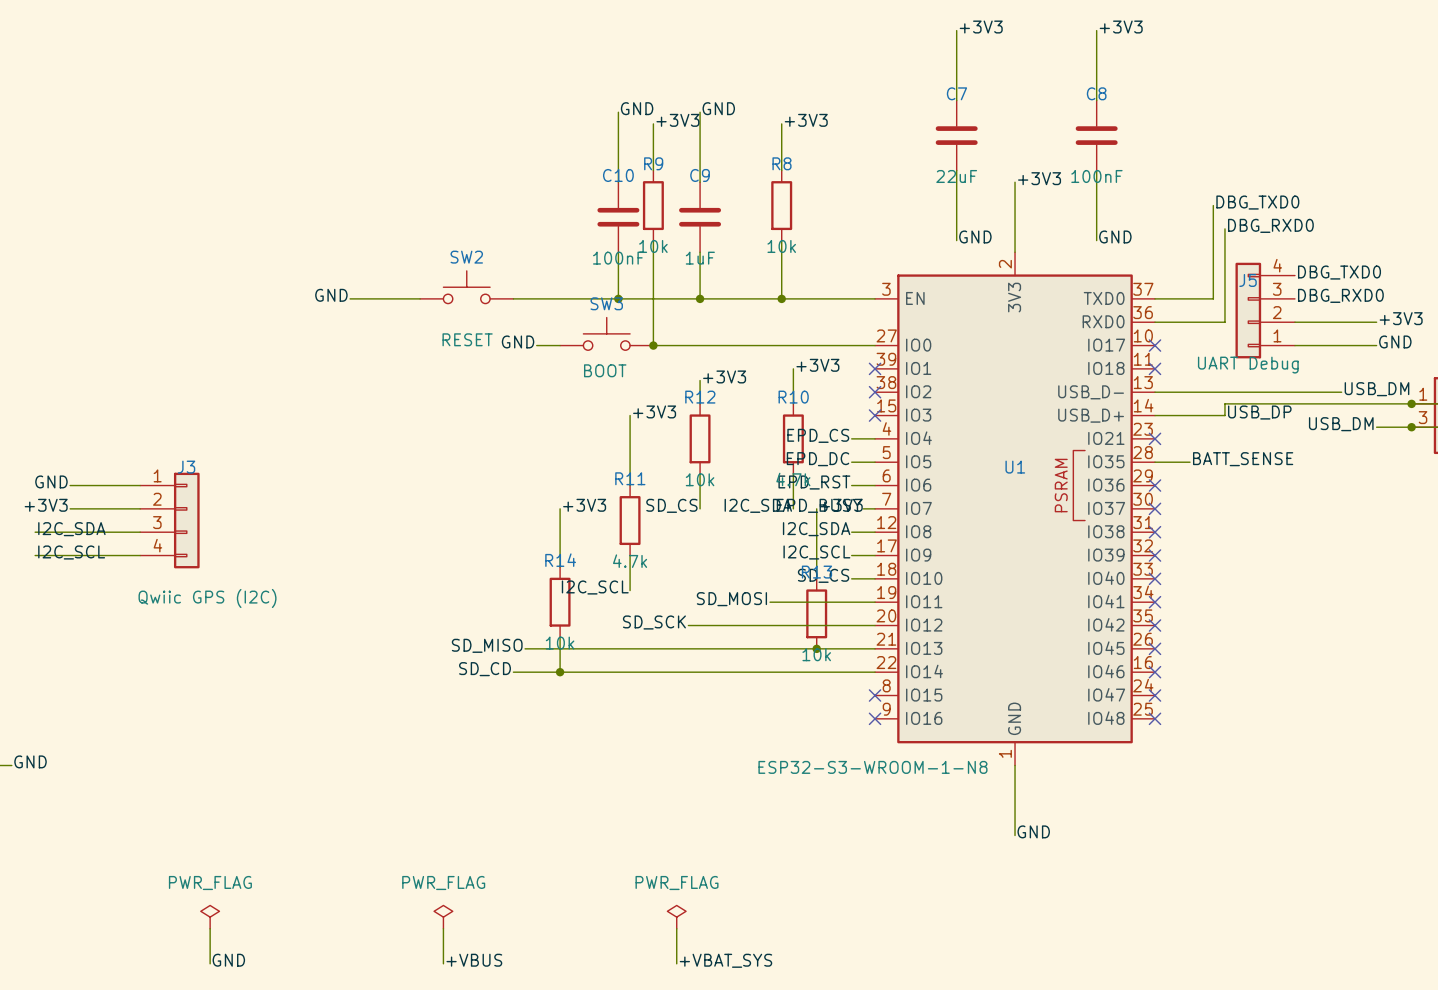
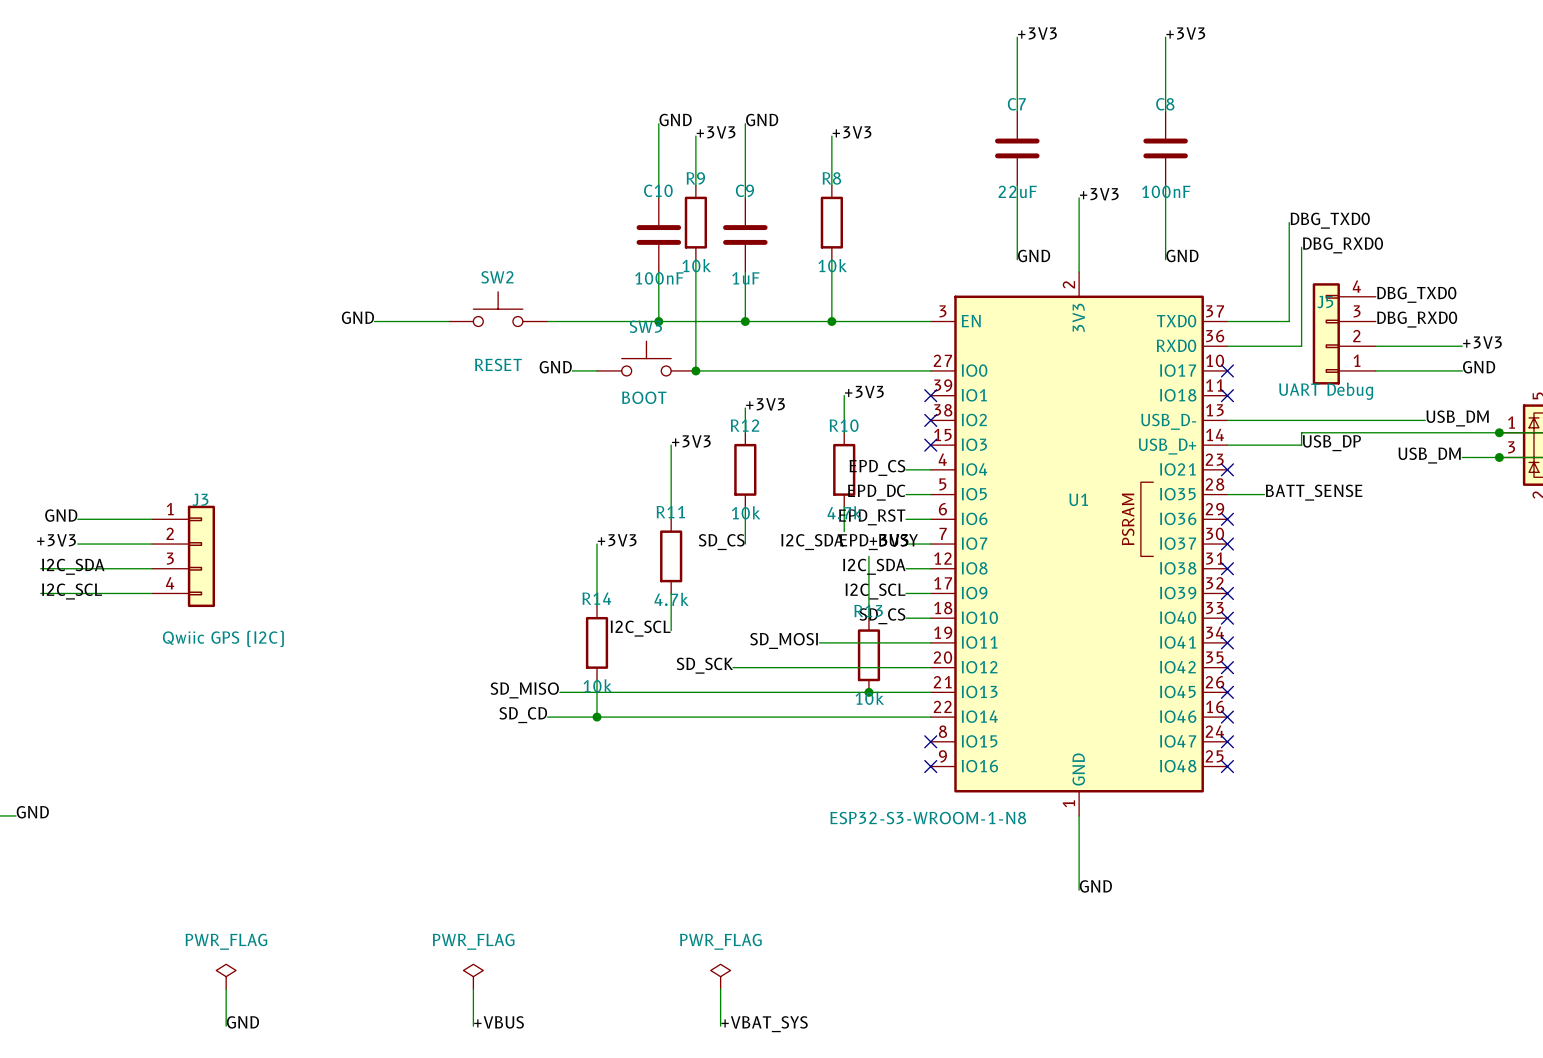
wire: (793, 497) (793, 508) -> none
wire: (816, 508) (816, 520) -> none
wire: none -> (906, 544) (918, 544)

